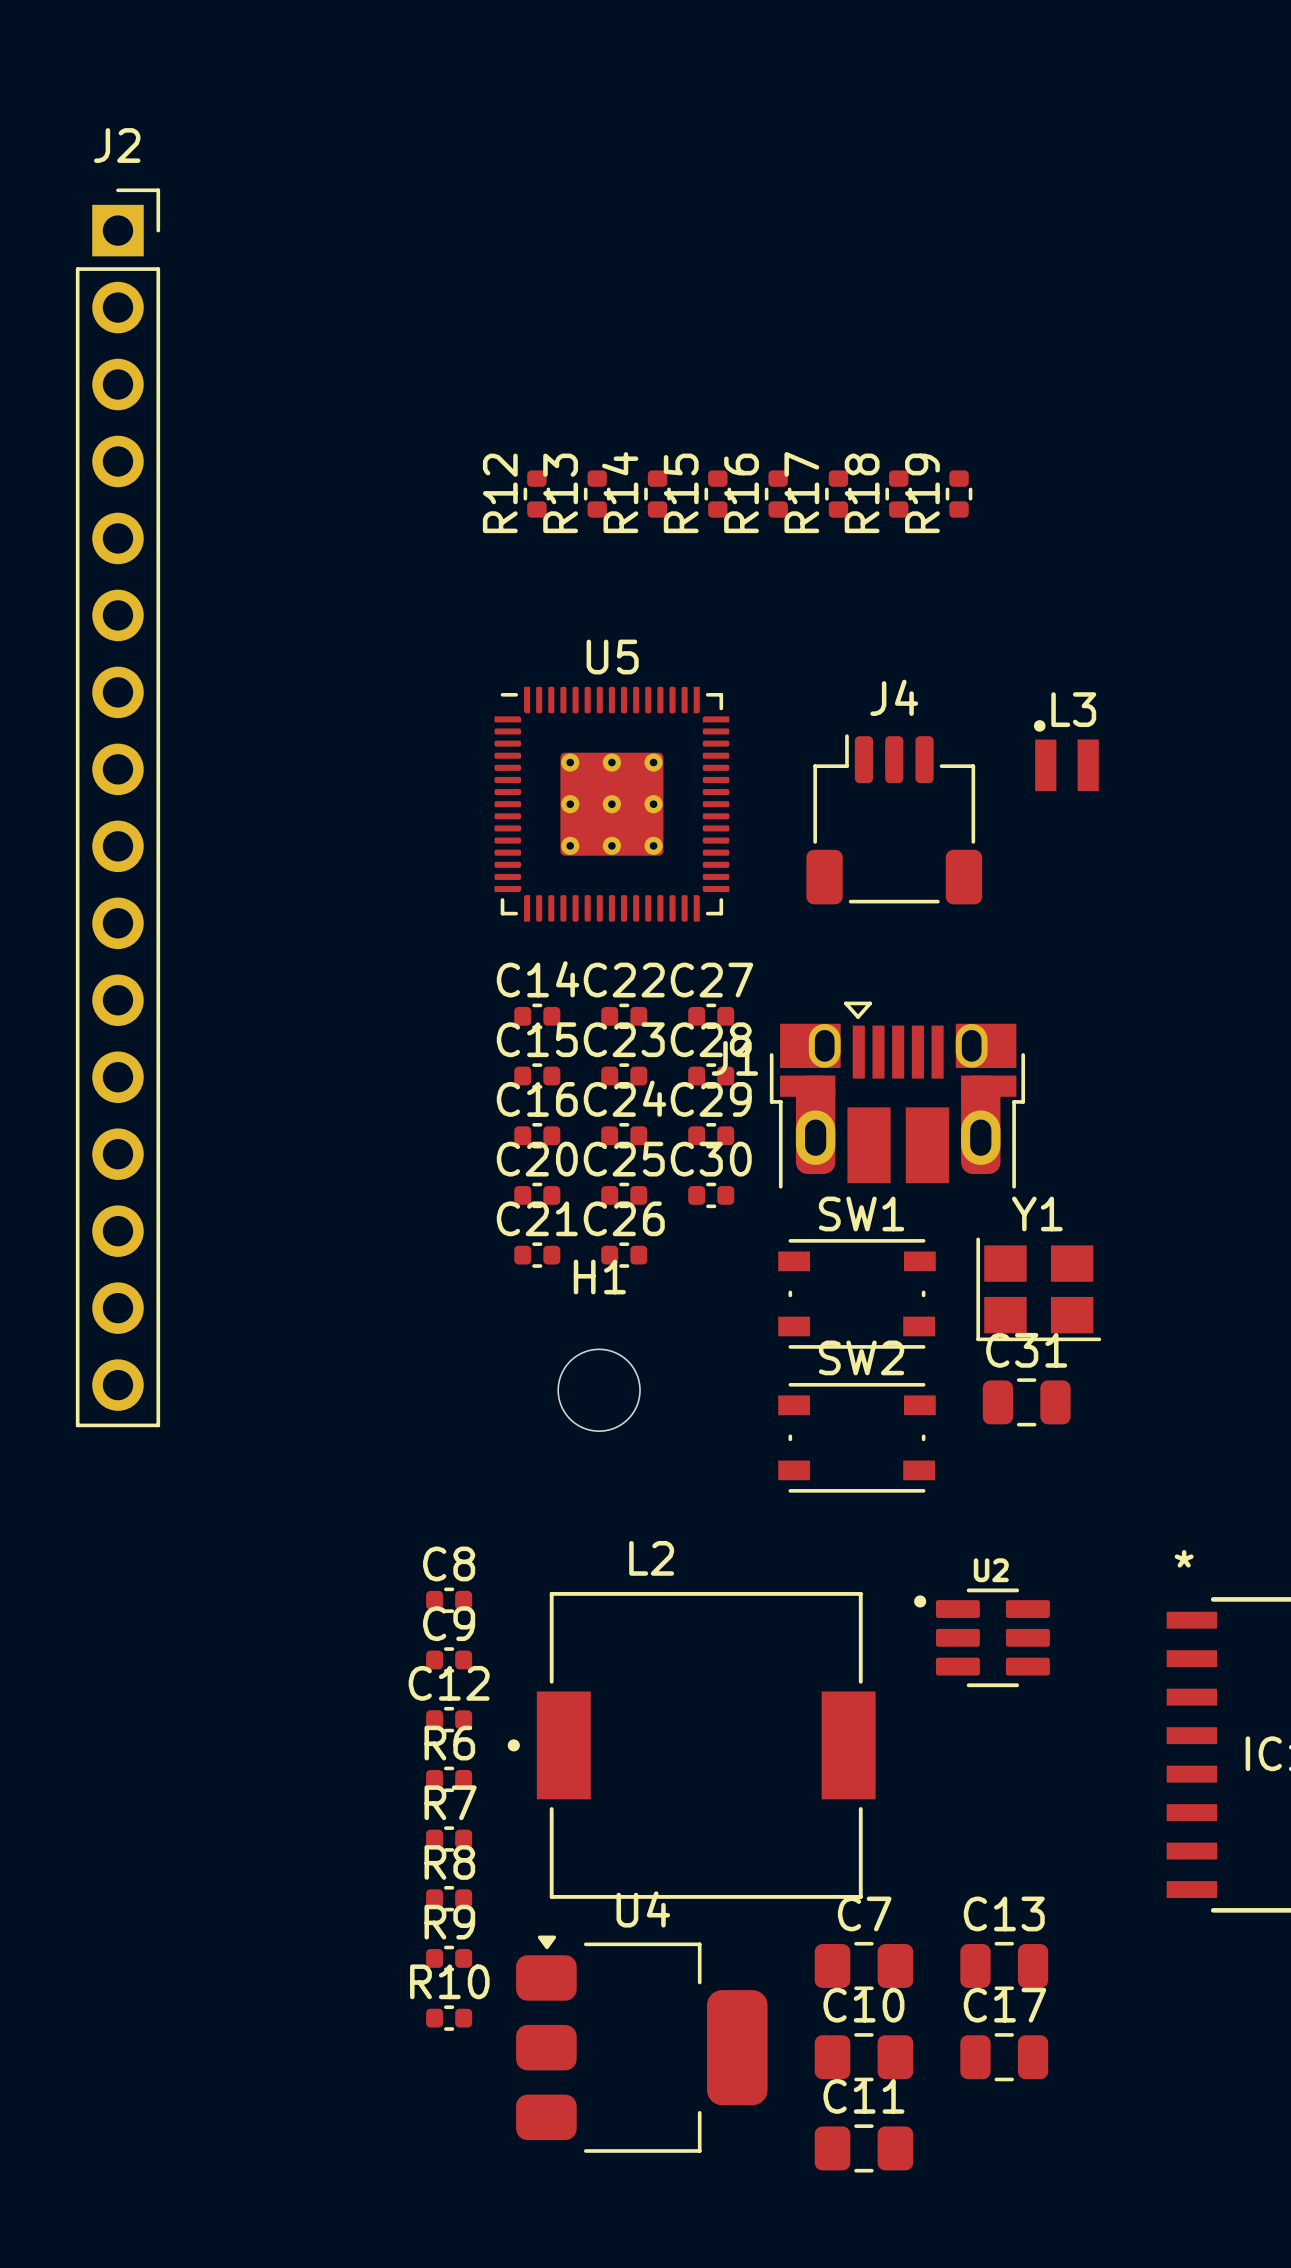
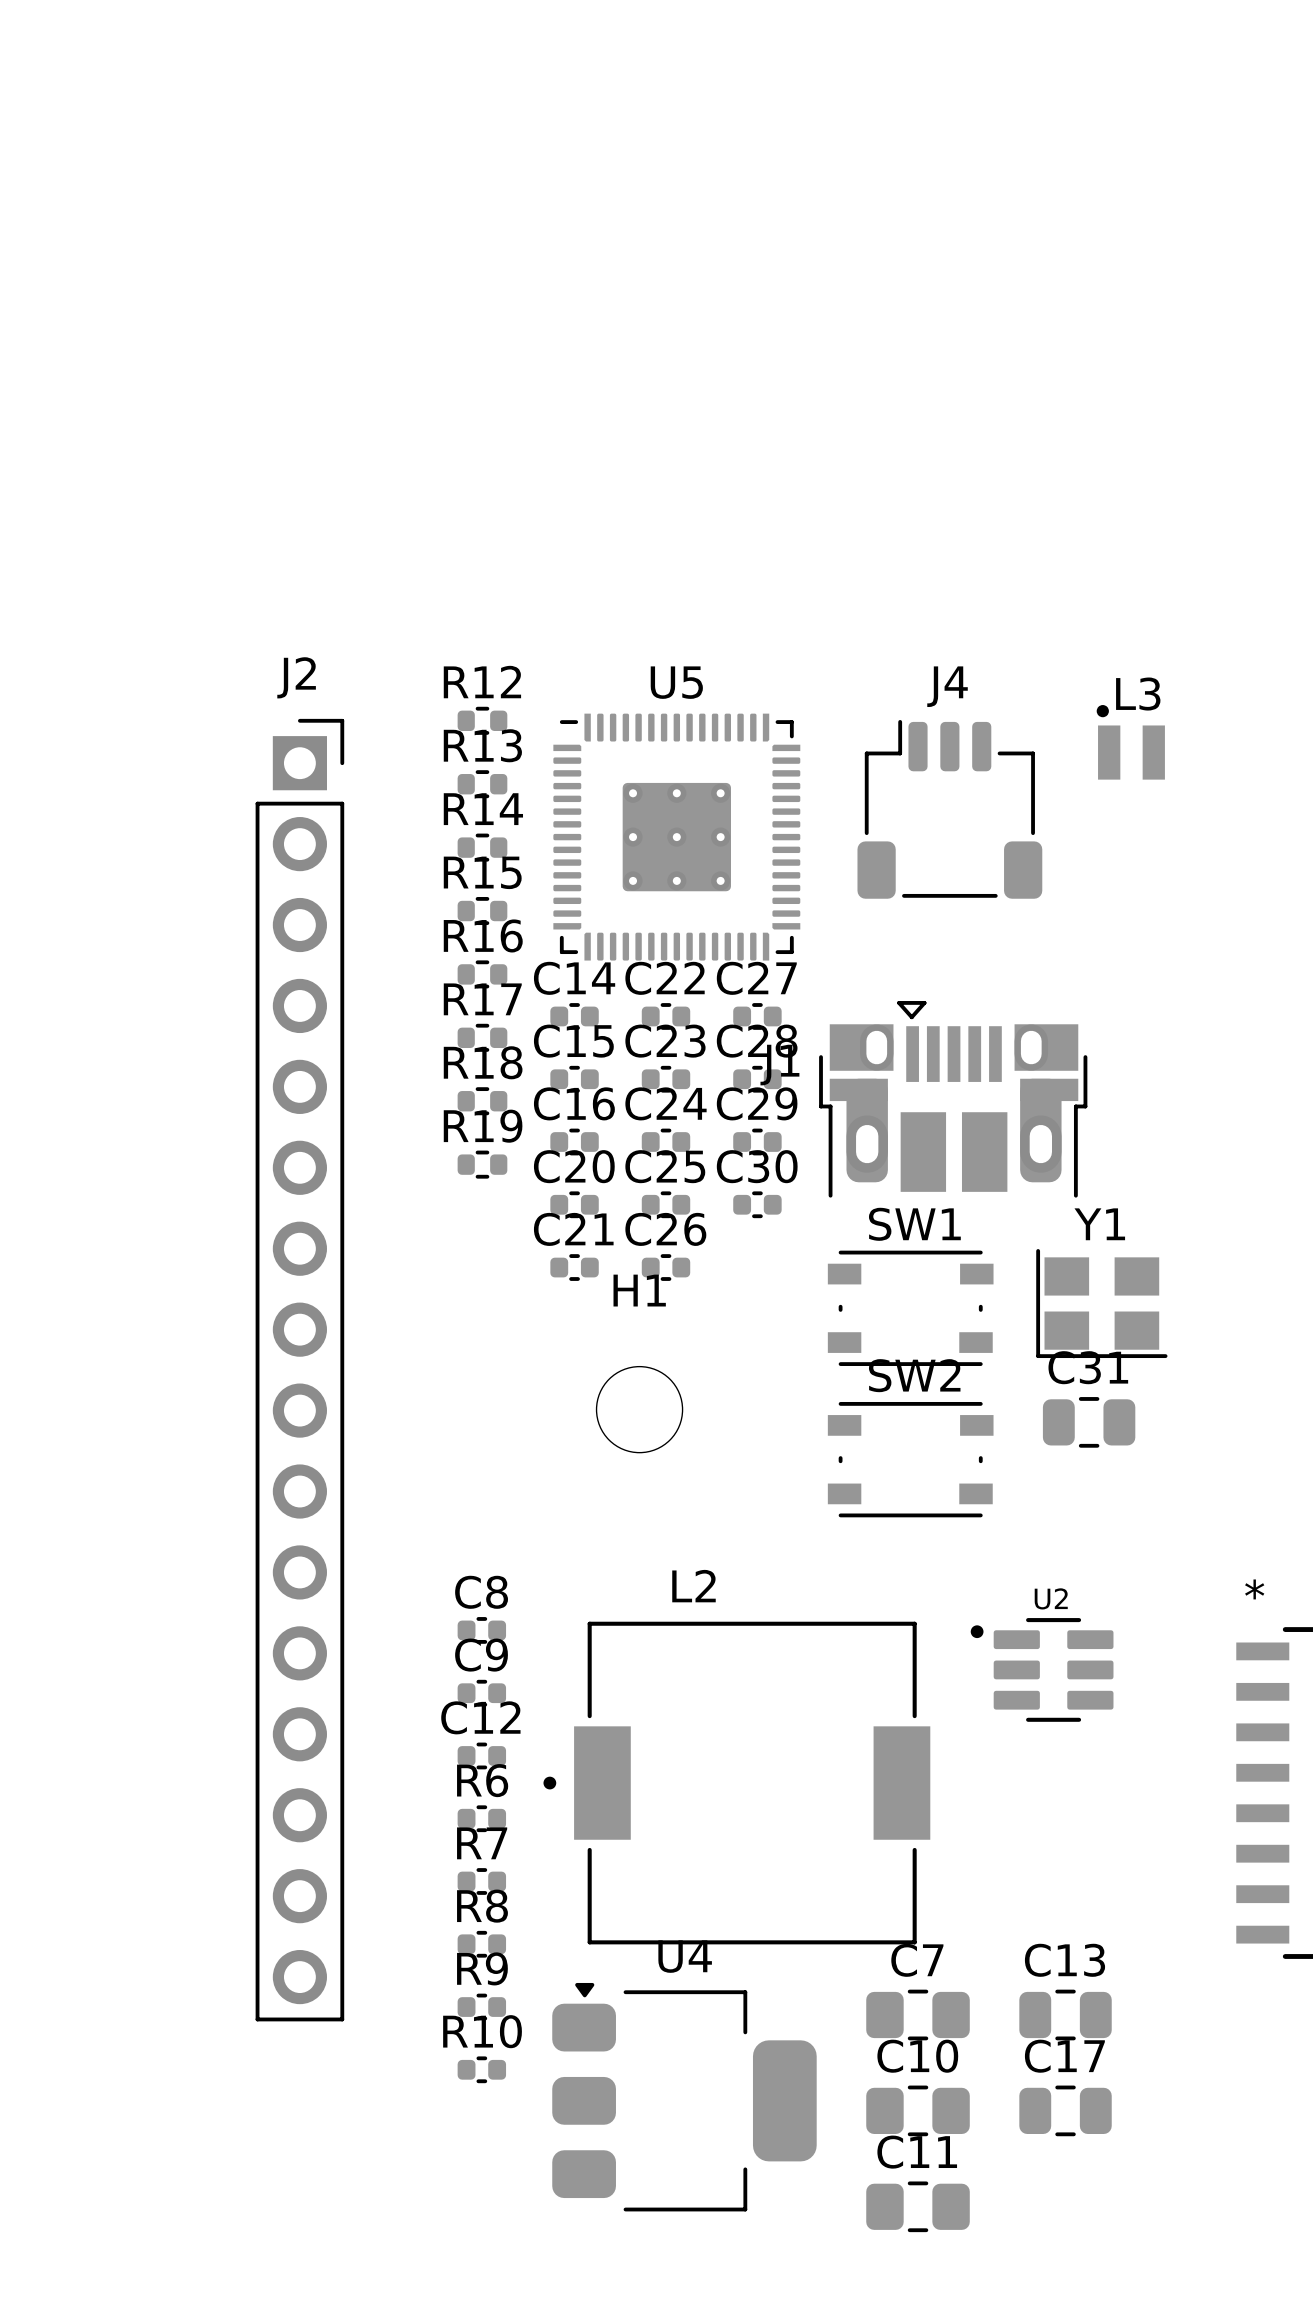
R12 rotation: 0° (536, 494) -> 90° clockwise (482, 720)
R12 position: (536, 494) -> (482, 720)
R13 rotation: 0° (597, 494) -> 90° clockwise (482, 784)
R13 position: (597, 494) -> (482, 784)
R14 rotation: 0° (657, 494) -> 90° clockwise (482, 847)
R14 position: (657, 494) -> (482, 847)
R15 rotation: 0° (717, 494) -> 90° clockwise (482, 911)
R15 position: (717, 494) -> (482, 911)
R16 rotation: 0° (778, 494) -> 90° clockwise (482, 974)
R16 position: (778, 494) -> (482, 974)
R17 rotation: 0° (838, 494) -> 90° clockwise (482, 1037)
R17 position: (838, 494) -> (482, 1037)
R18 rotation: 0° (898, 494) -> 90° clockwise (482, 1101)
R18 position: (898, 494) -> (482, 1101)
R19 rotation: 0° (959, 494) -> 90° clockwise (482, 1164)
R19 position: (959, 494) -> (482, 1164)
U5 position: (611, 804) -> (676, 837)
J2 position: (117, 807) -> (299, 1370)

